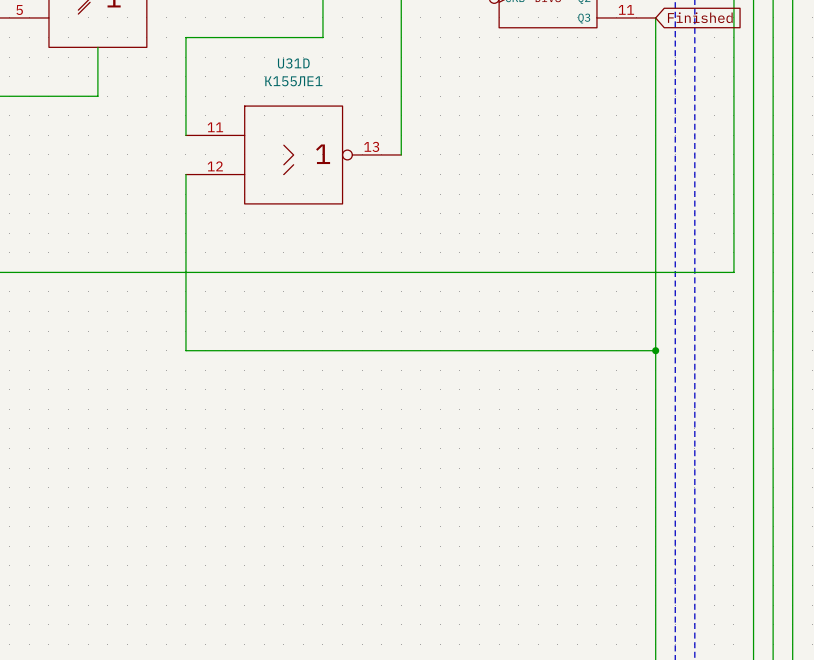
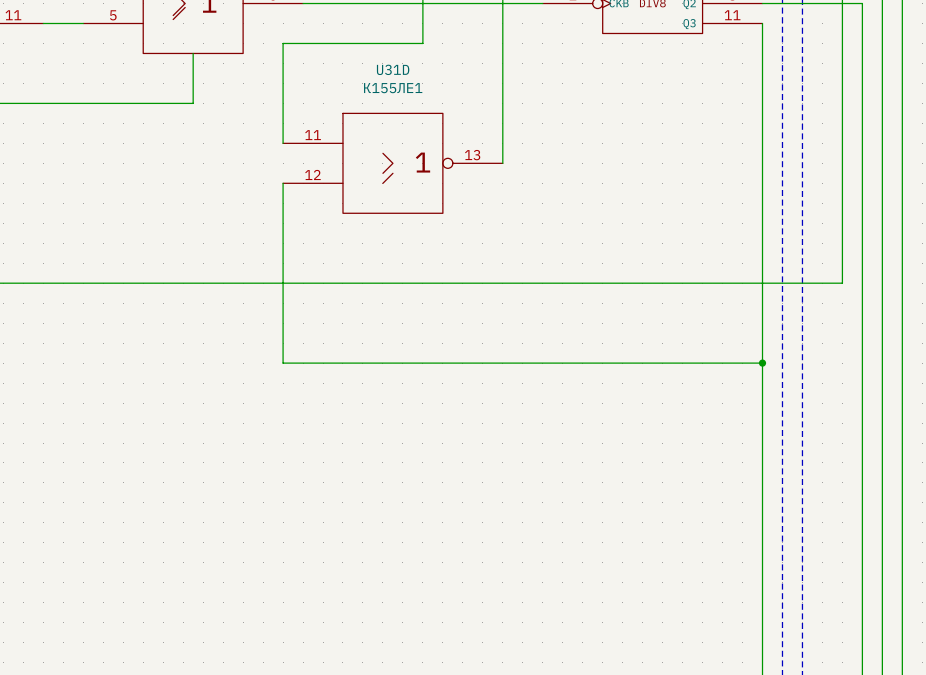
global label: Finished (700, 17) -> none

